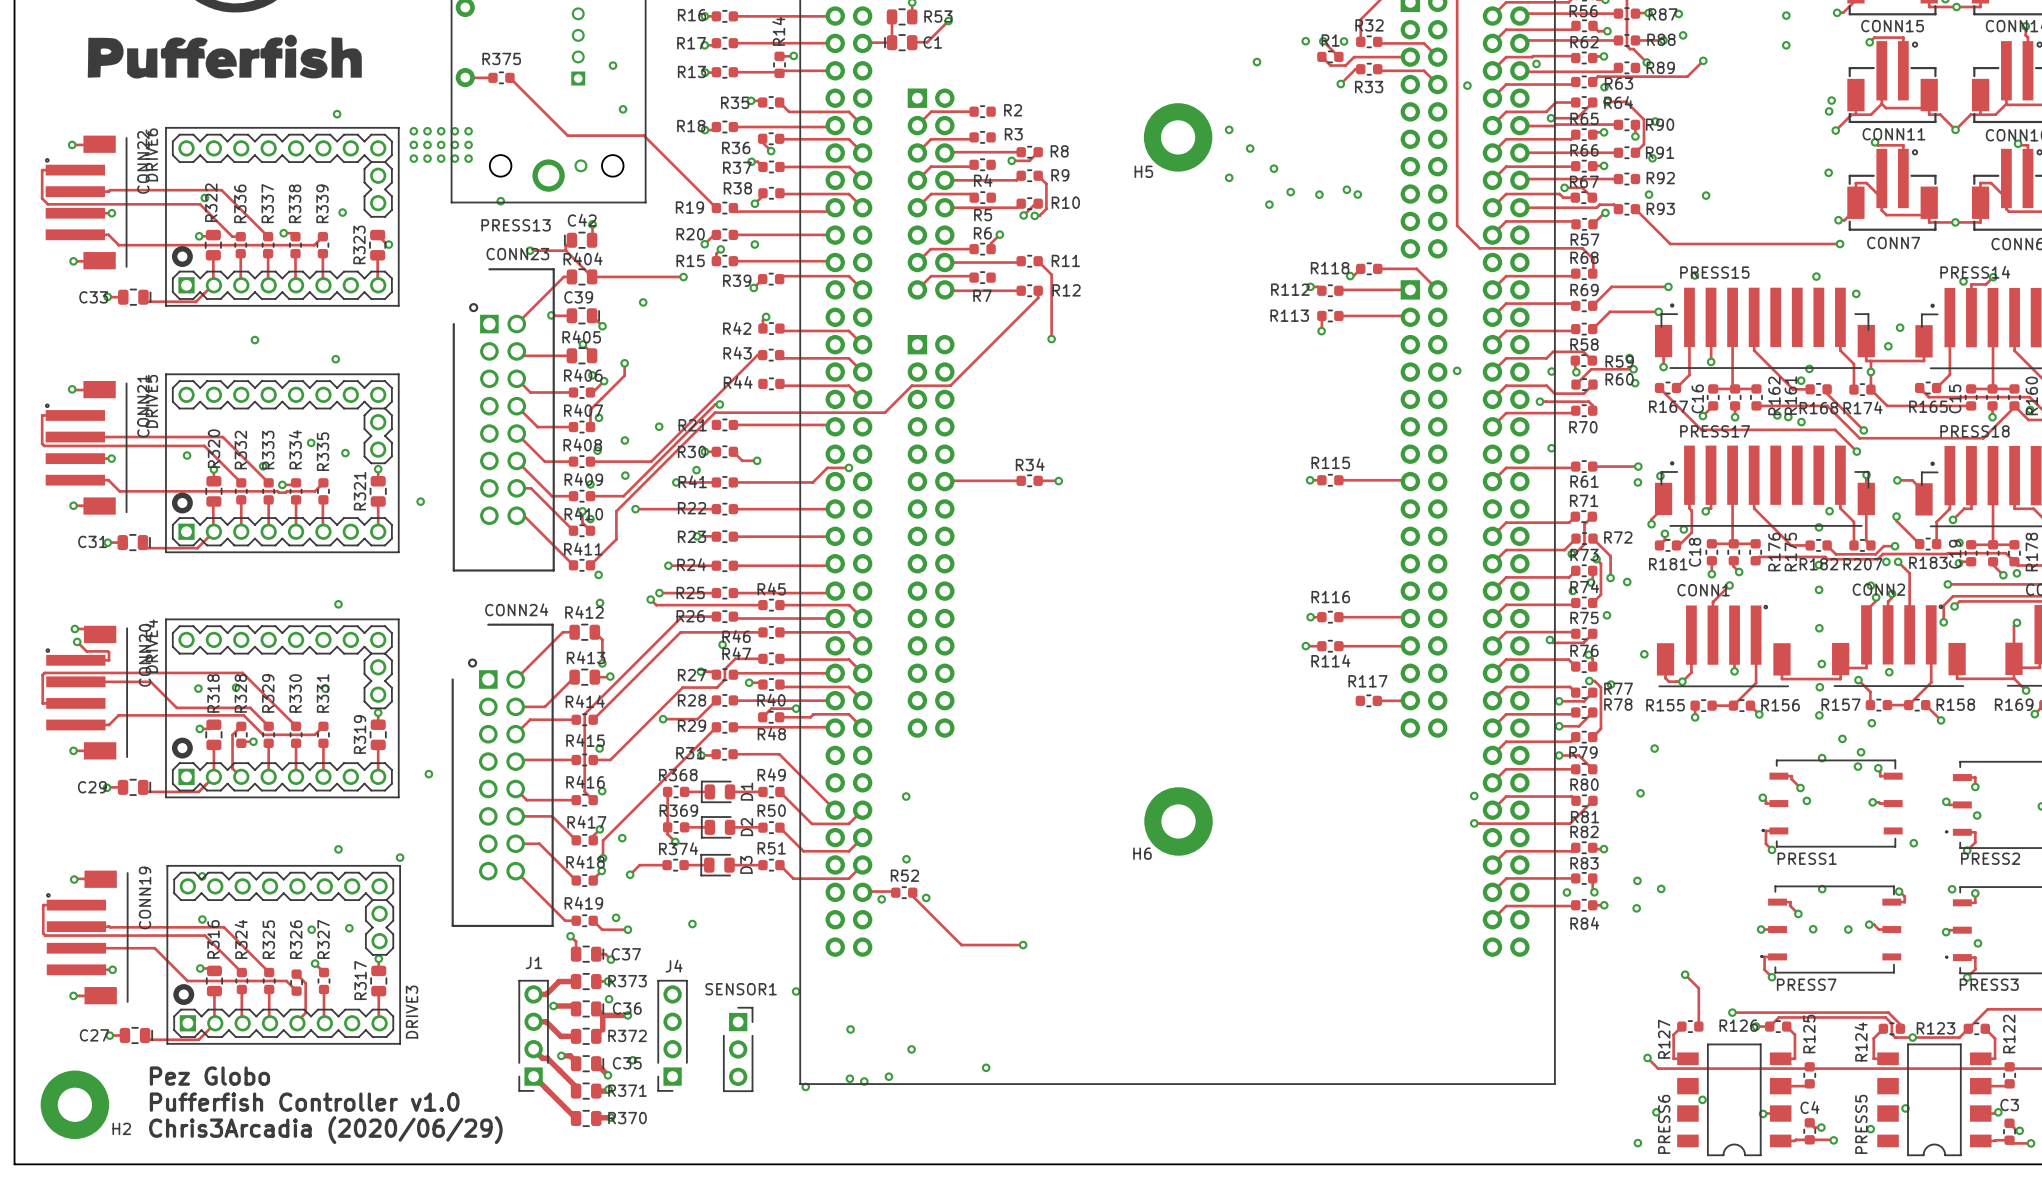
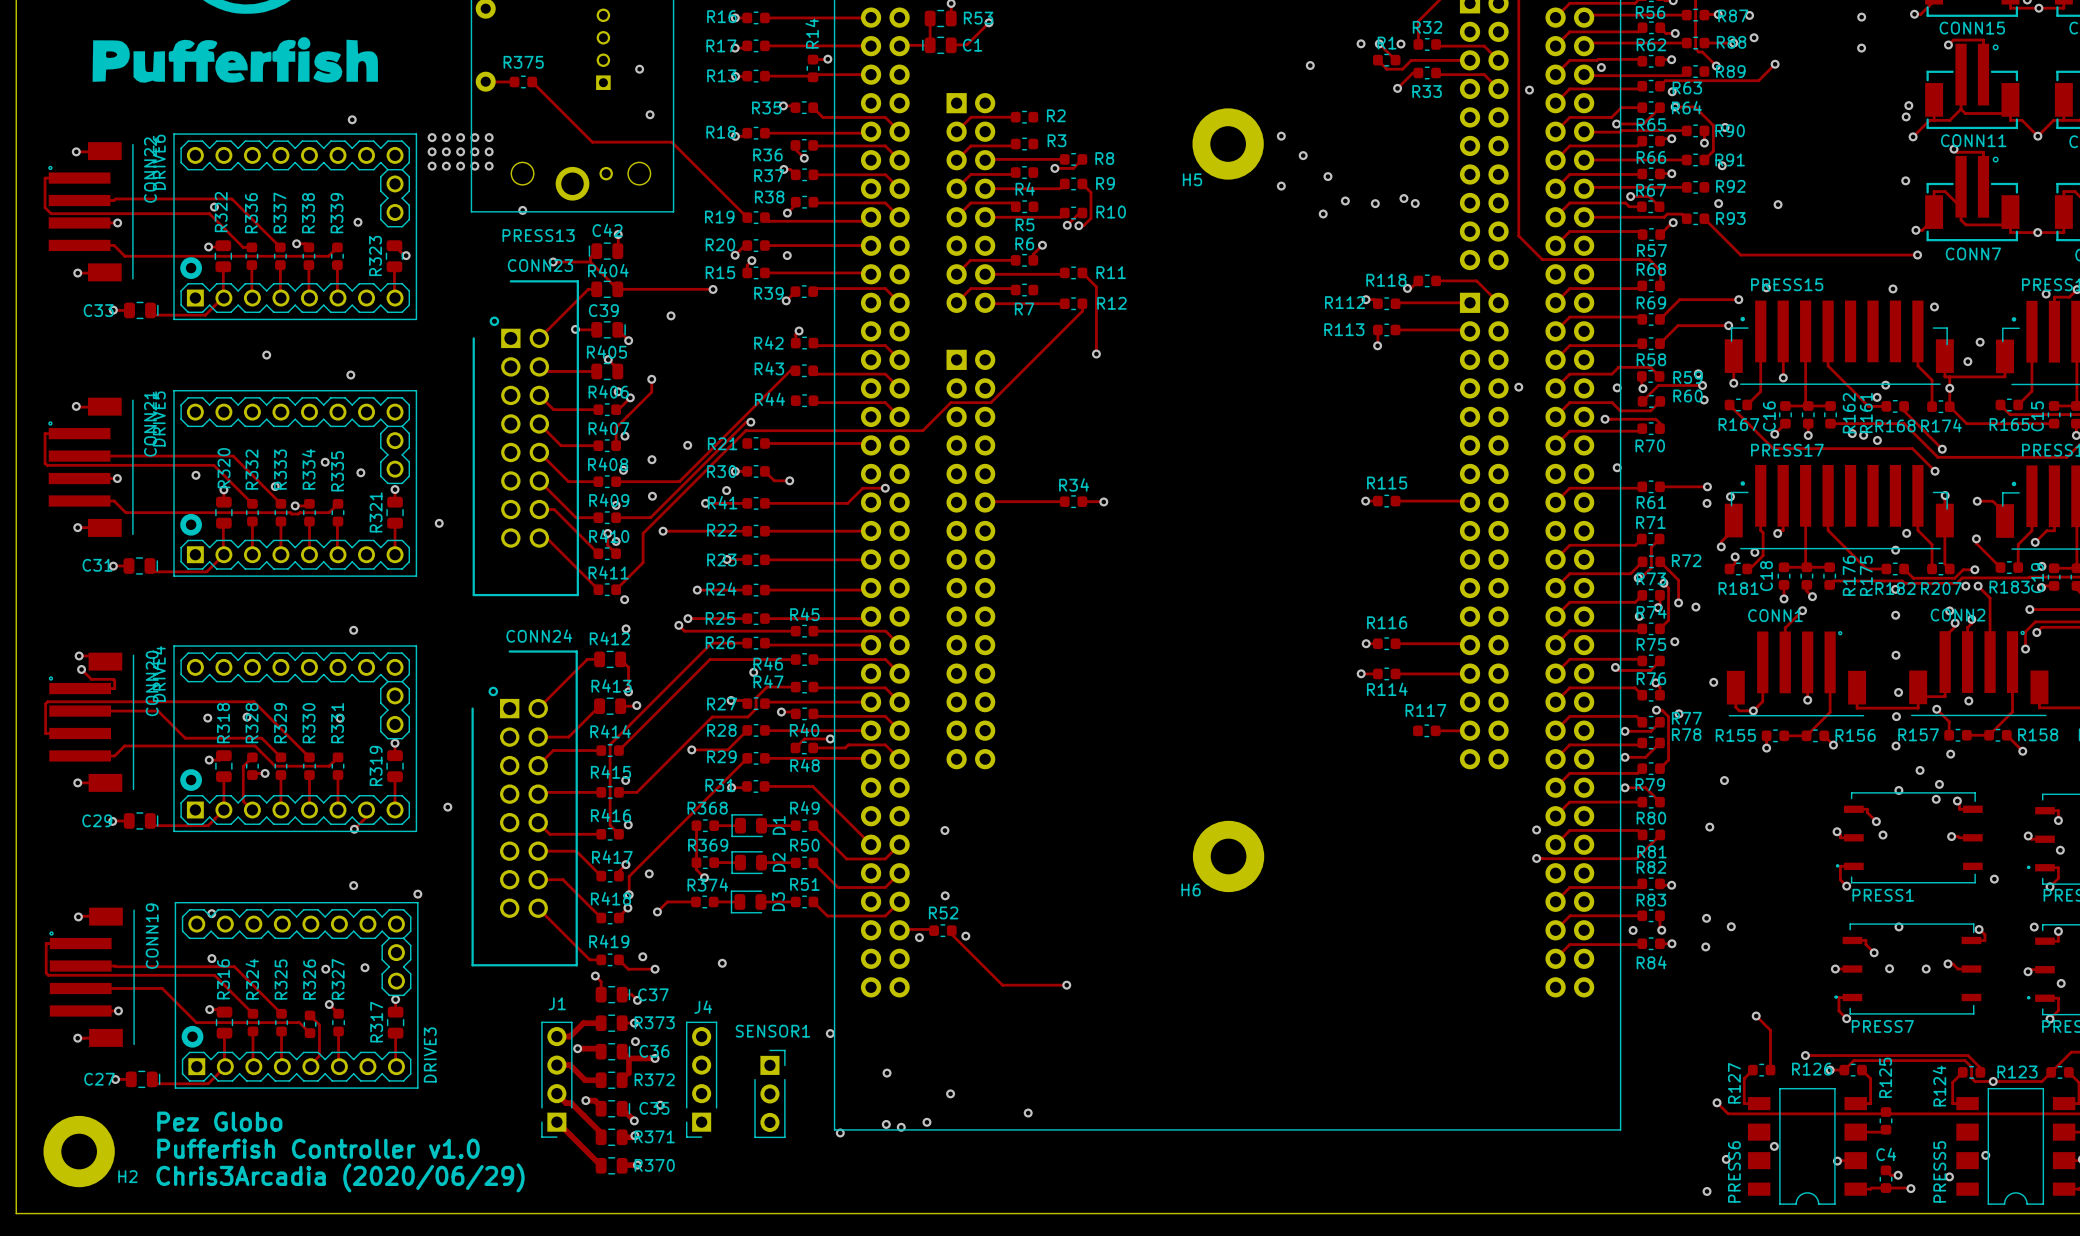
track: none -> (366, 817) (354, 829)
via: none -> (354, 829)

